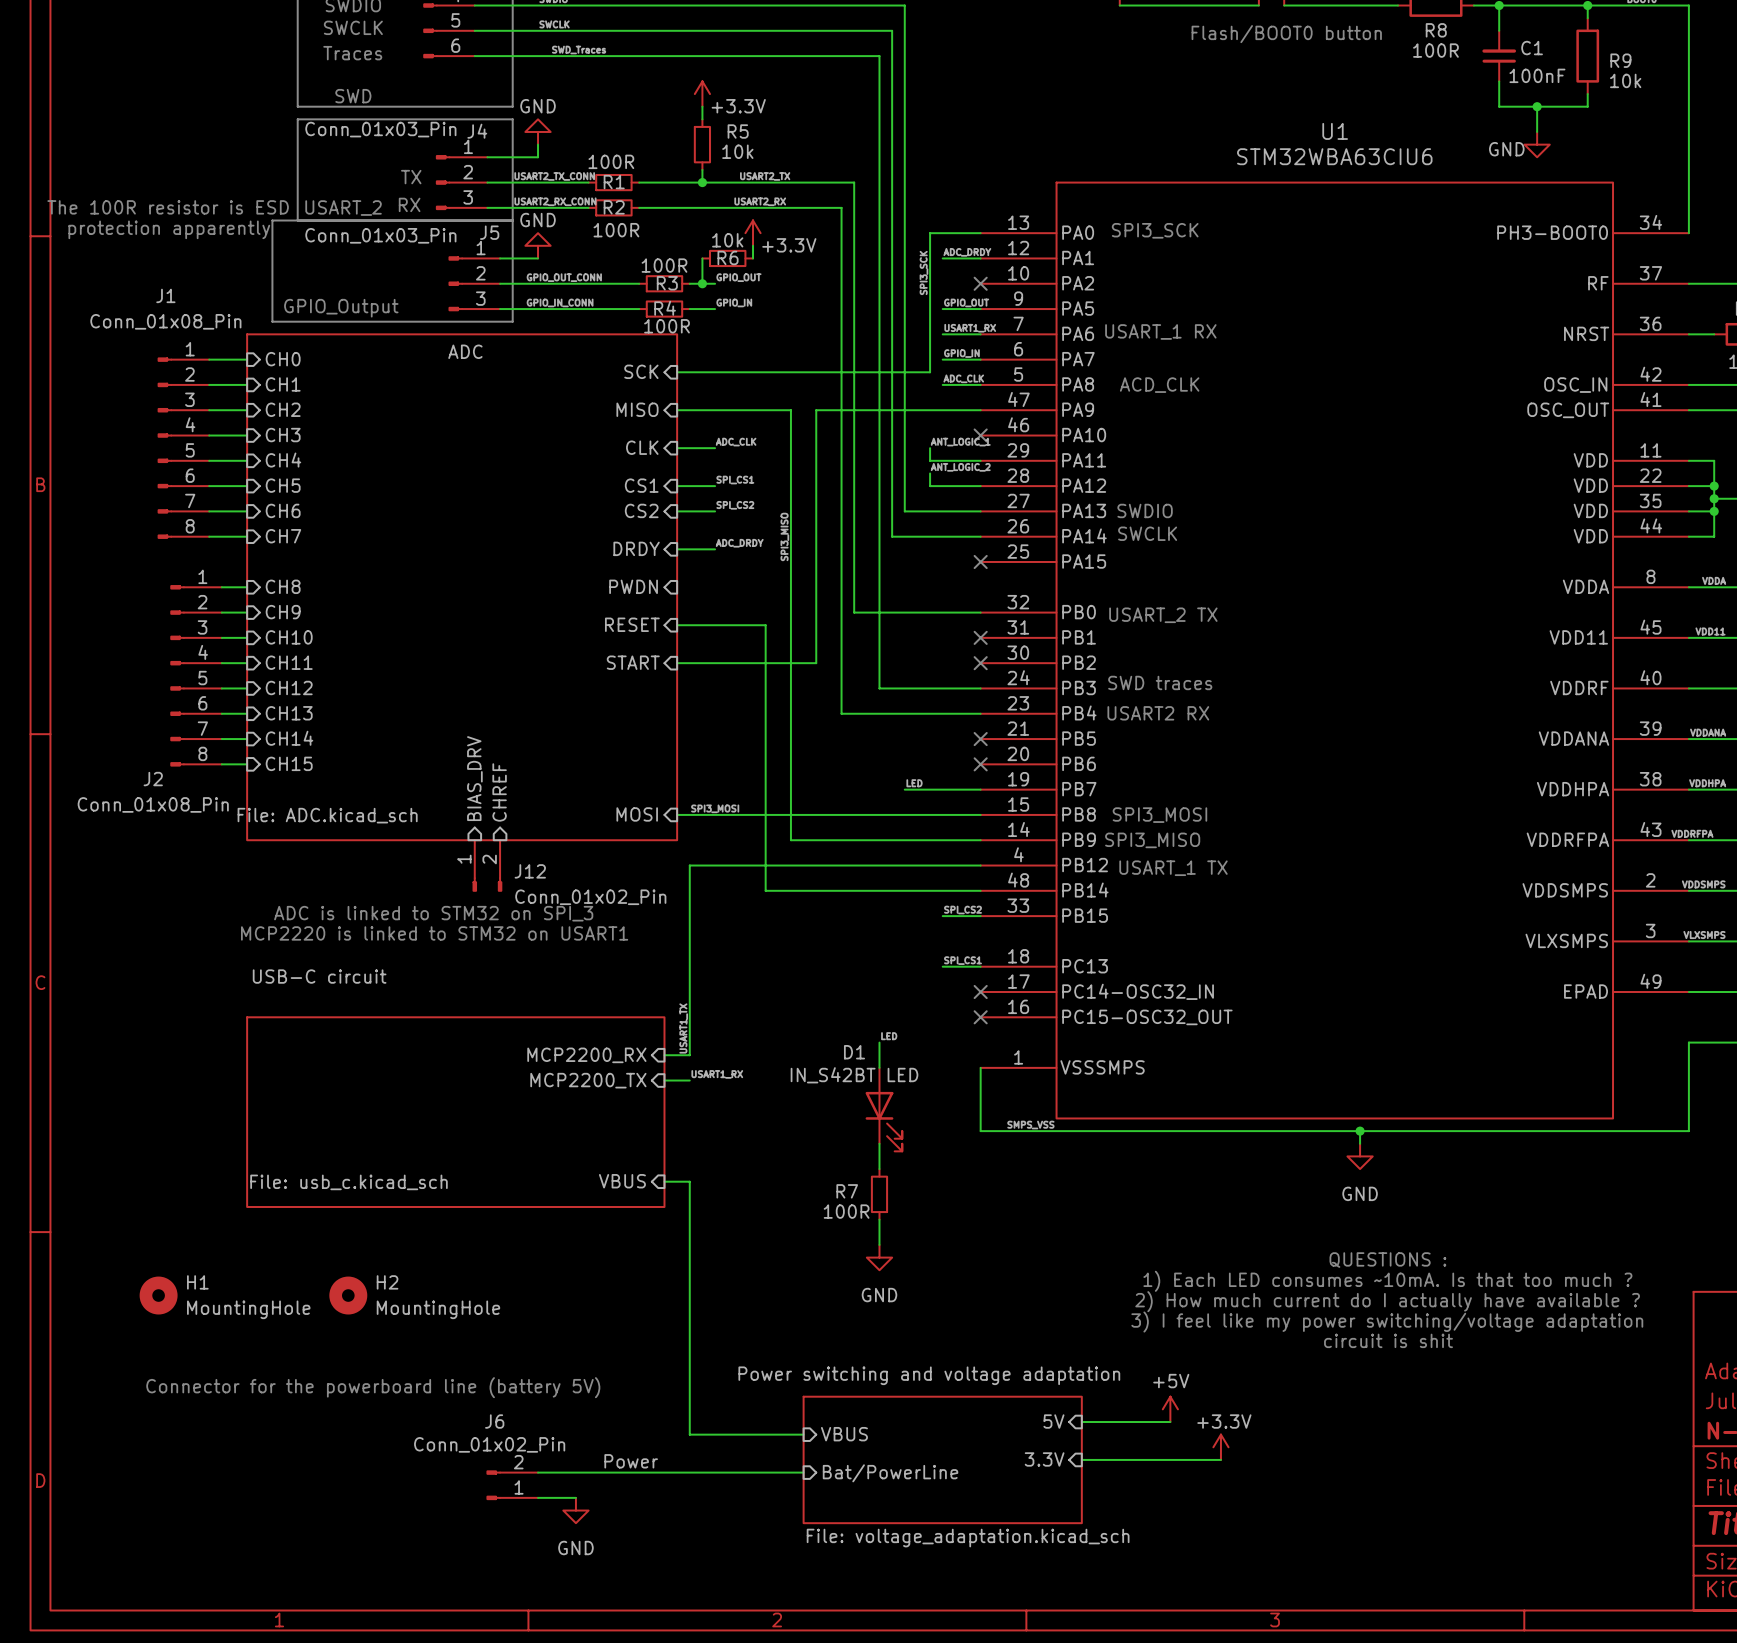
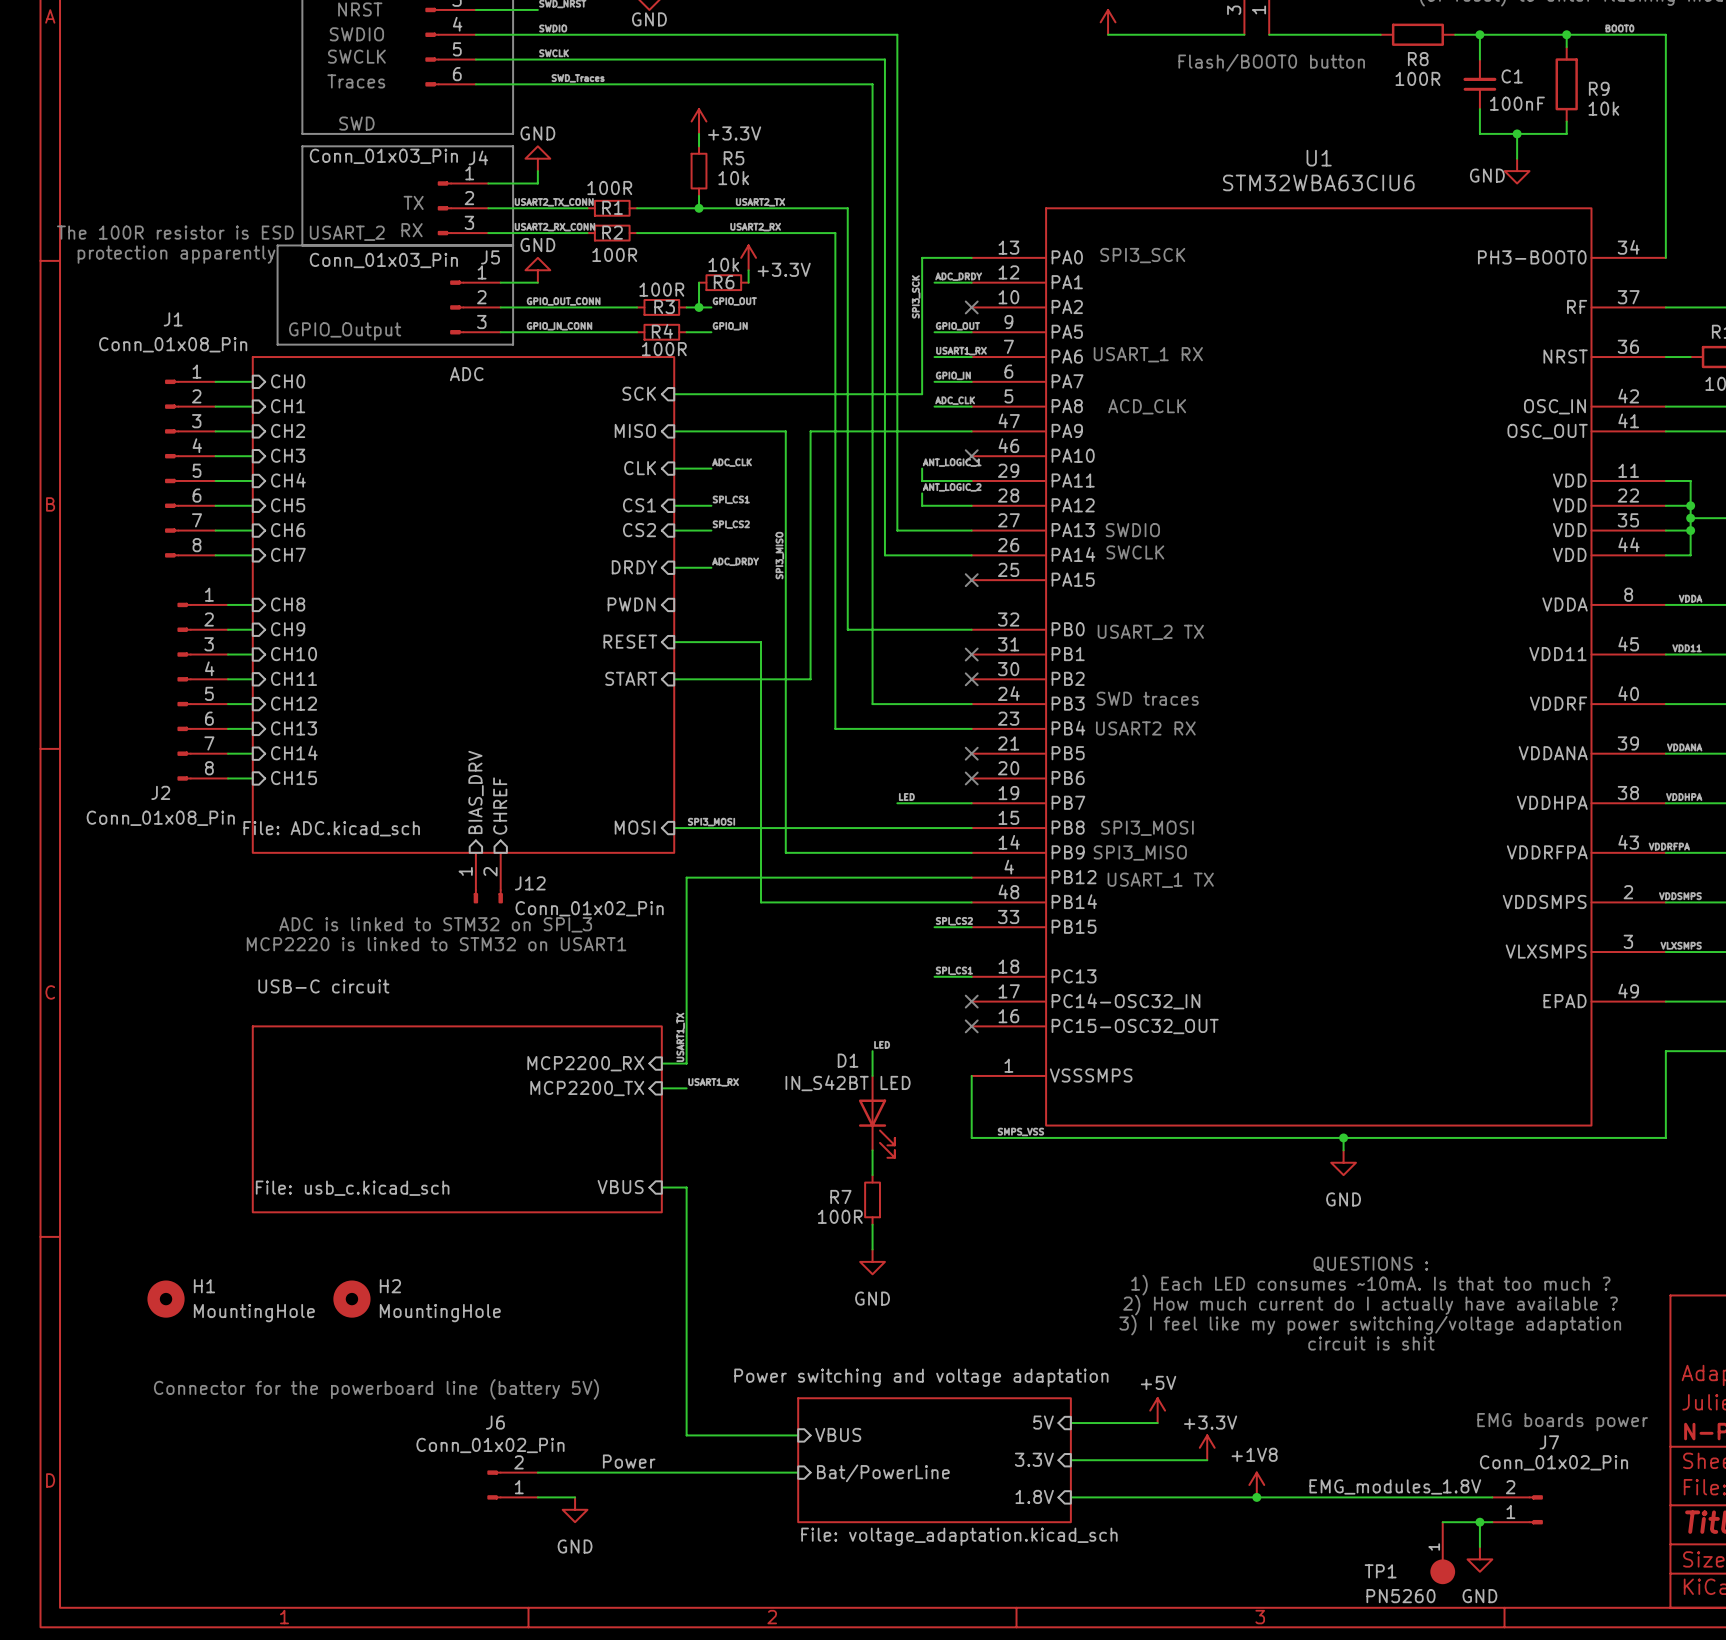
text: none -> EMG boards power (1562, 1422)
power symbol: none -> +1V8 (1256, 1485)
label: none -> EMG_modules_1.8V (1395, 1486)
sheet pin: none -> 1.8V (1034, 1496)
wire: none -> (1070, 1497) (1492, 1497)
junction: none -> (1256, 1497)
J7: none -> Conn_01x02_Pin (1517, 1509)
wire: none -> (1442, 1522) (1492, 1522)
wire: none -> (1479, 1522) (1479, 1546)
junction: none -> (1479, 1522)
TP1: none -> PN5260 (1442, 1553)
power symbol: none -> GND (1479, 1559)

